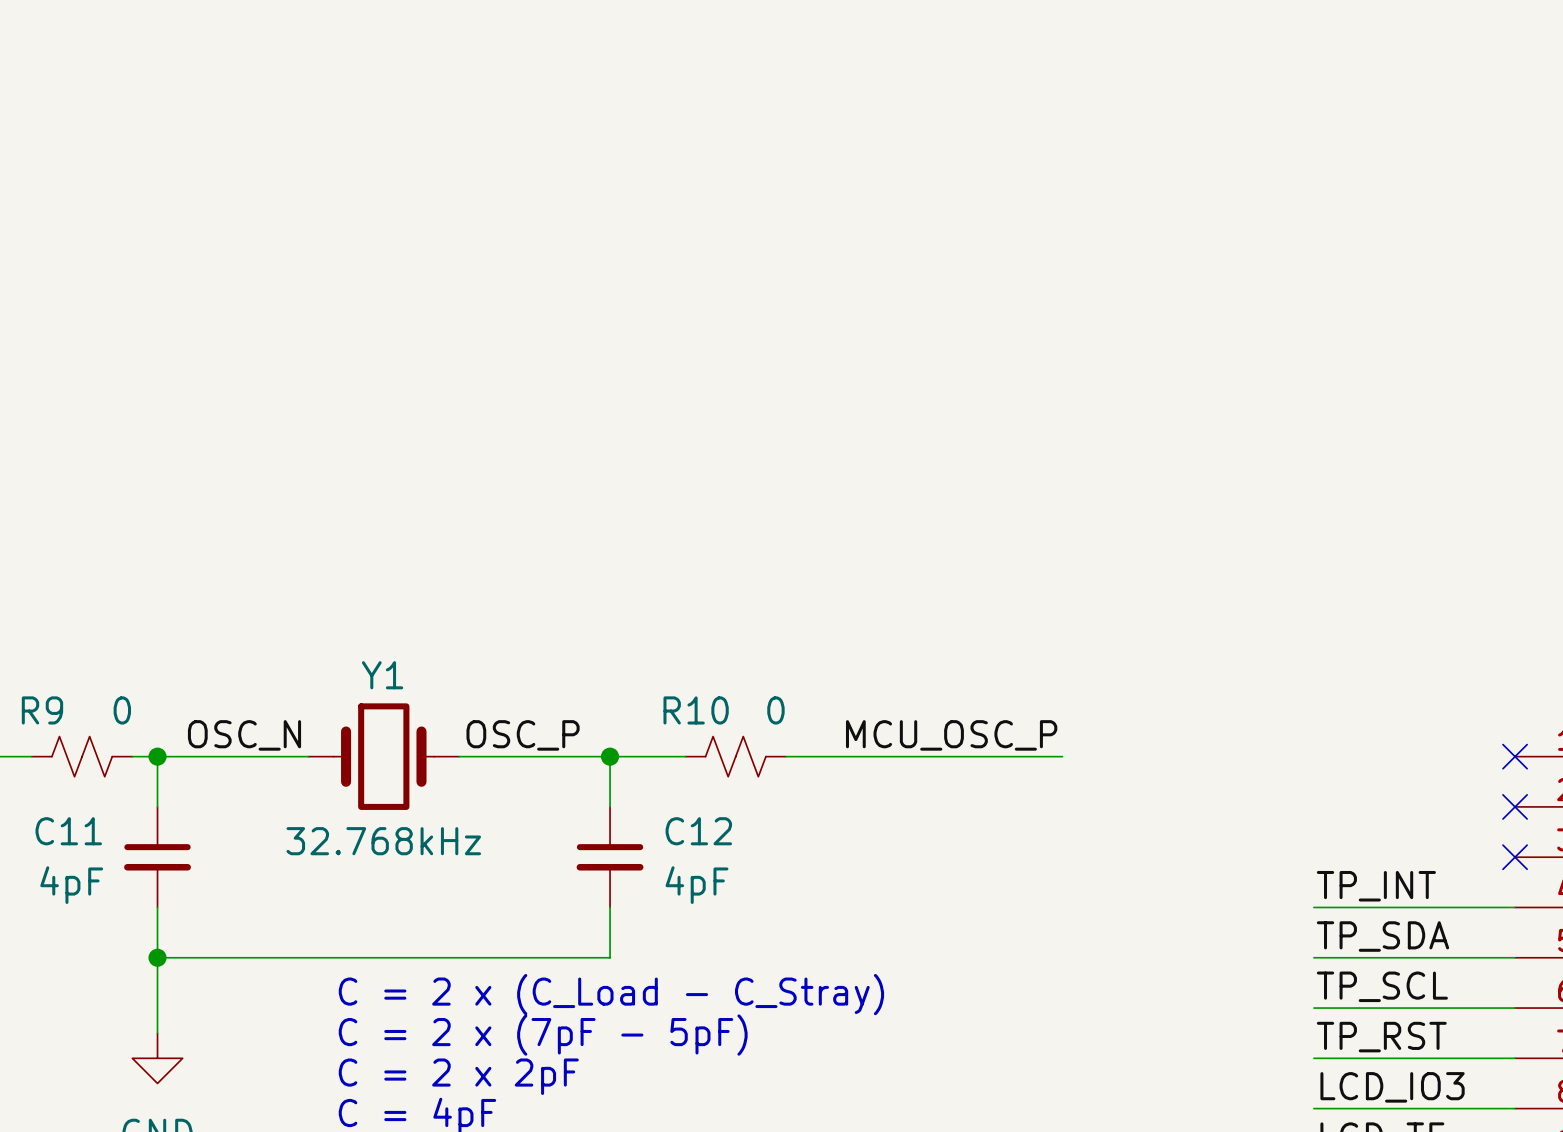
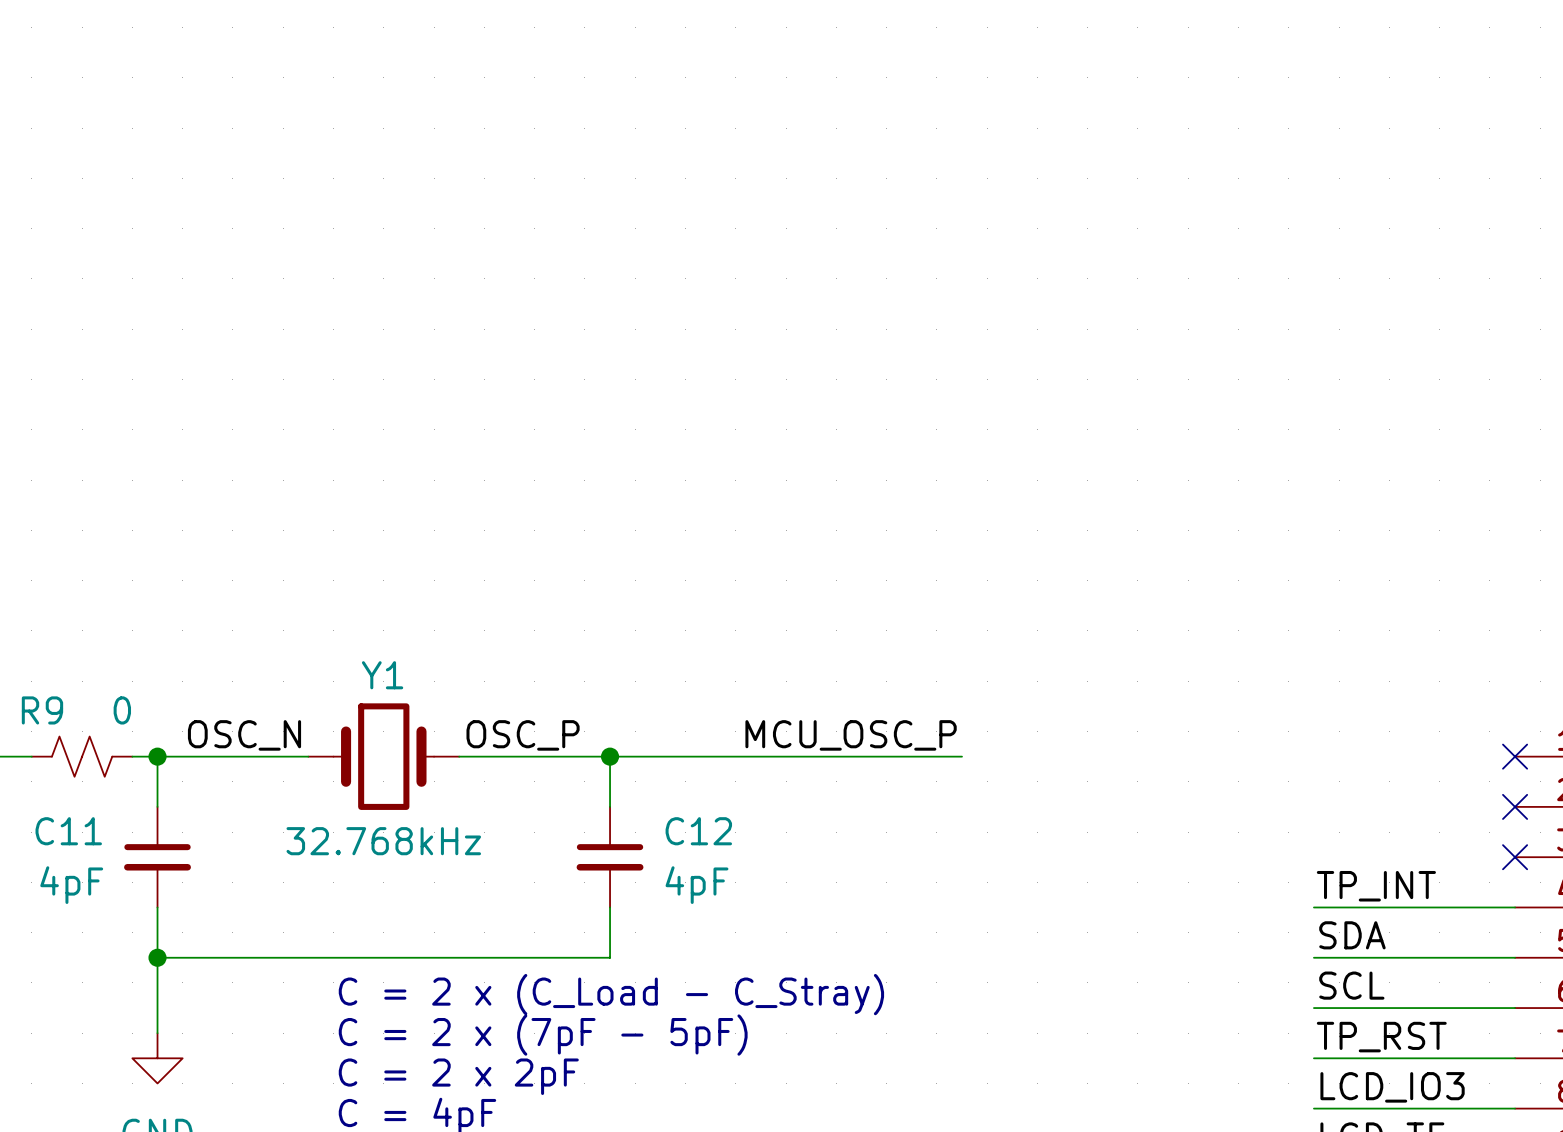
label position: MCU_OSC_P (951, 735) -> MCU_OSC_P (851, 735)
R10: 0 (735, 756) -> none
wire: (961, 756) (1062, 756) -> (685, 756) (786, 756)
label: TP_SDA (1382, 936) -> SDA (1352, 935)
label: TP_SCL (1382, 986) -> SCL (1351, 985)

